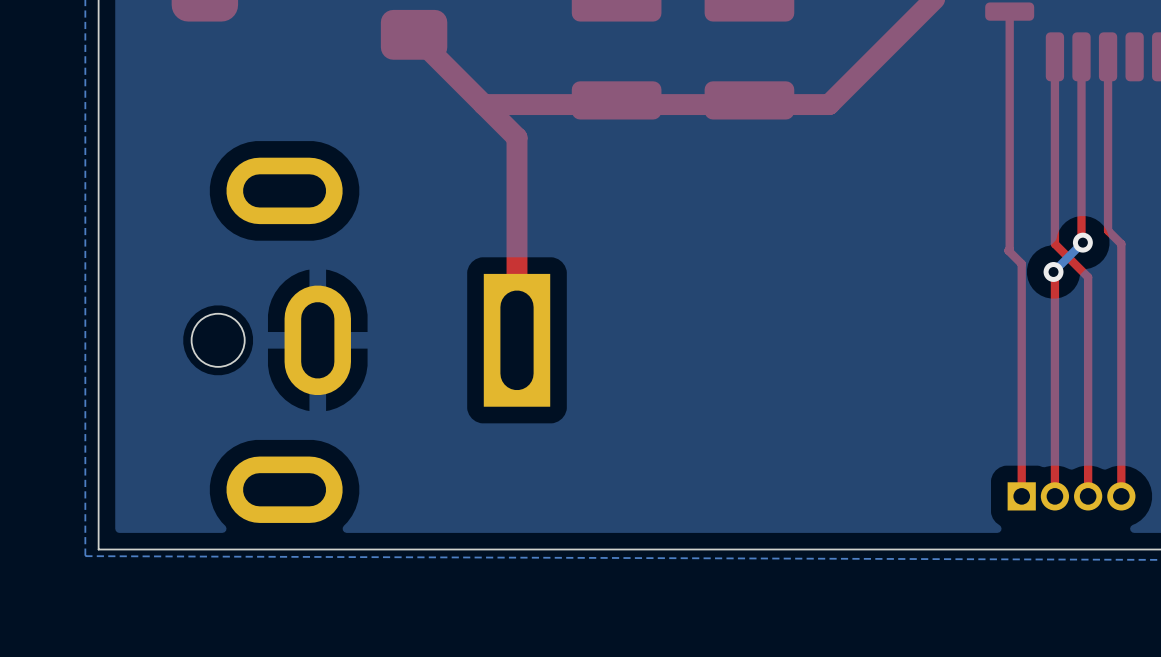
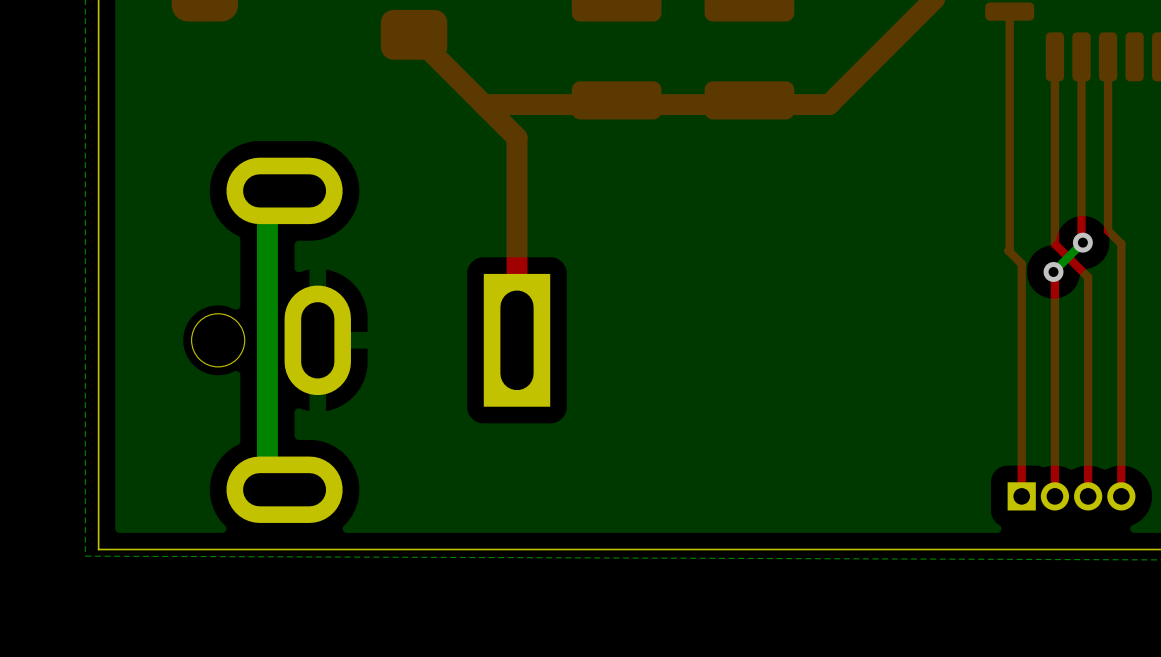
bottom track: none -> (284, 190) (267, 208) (267, 472) (284, 489)

